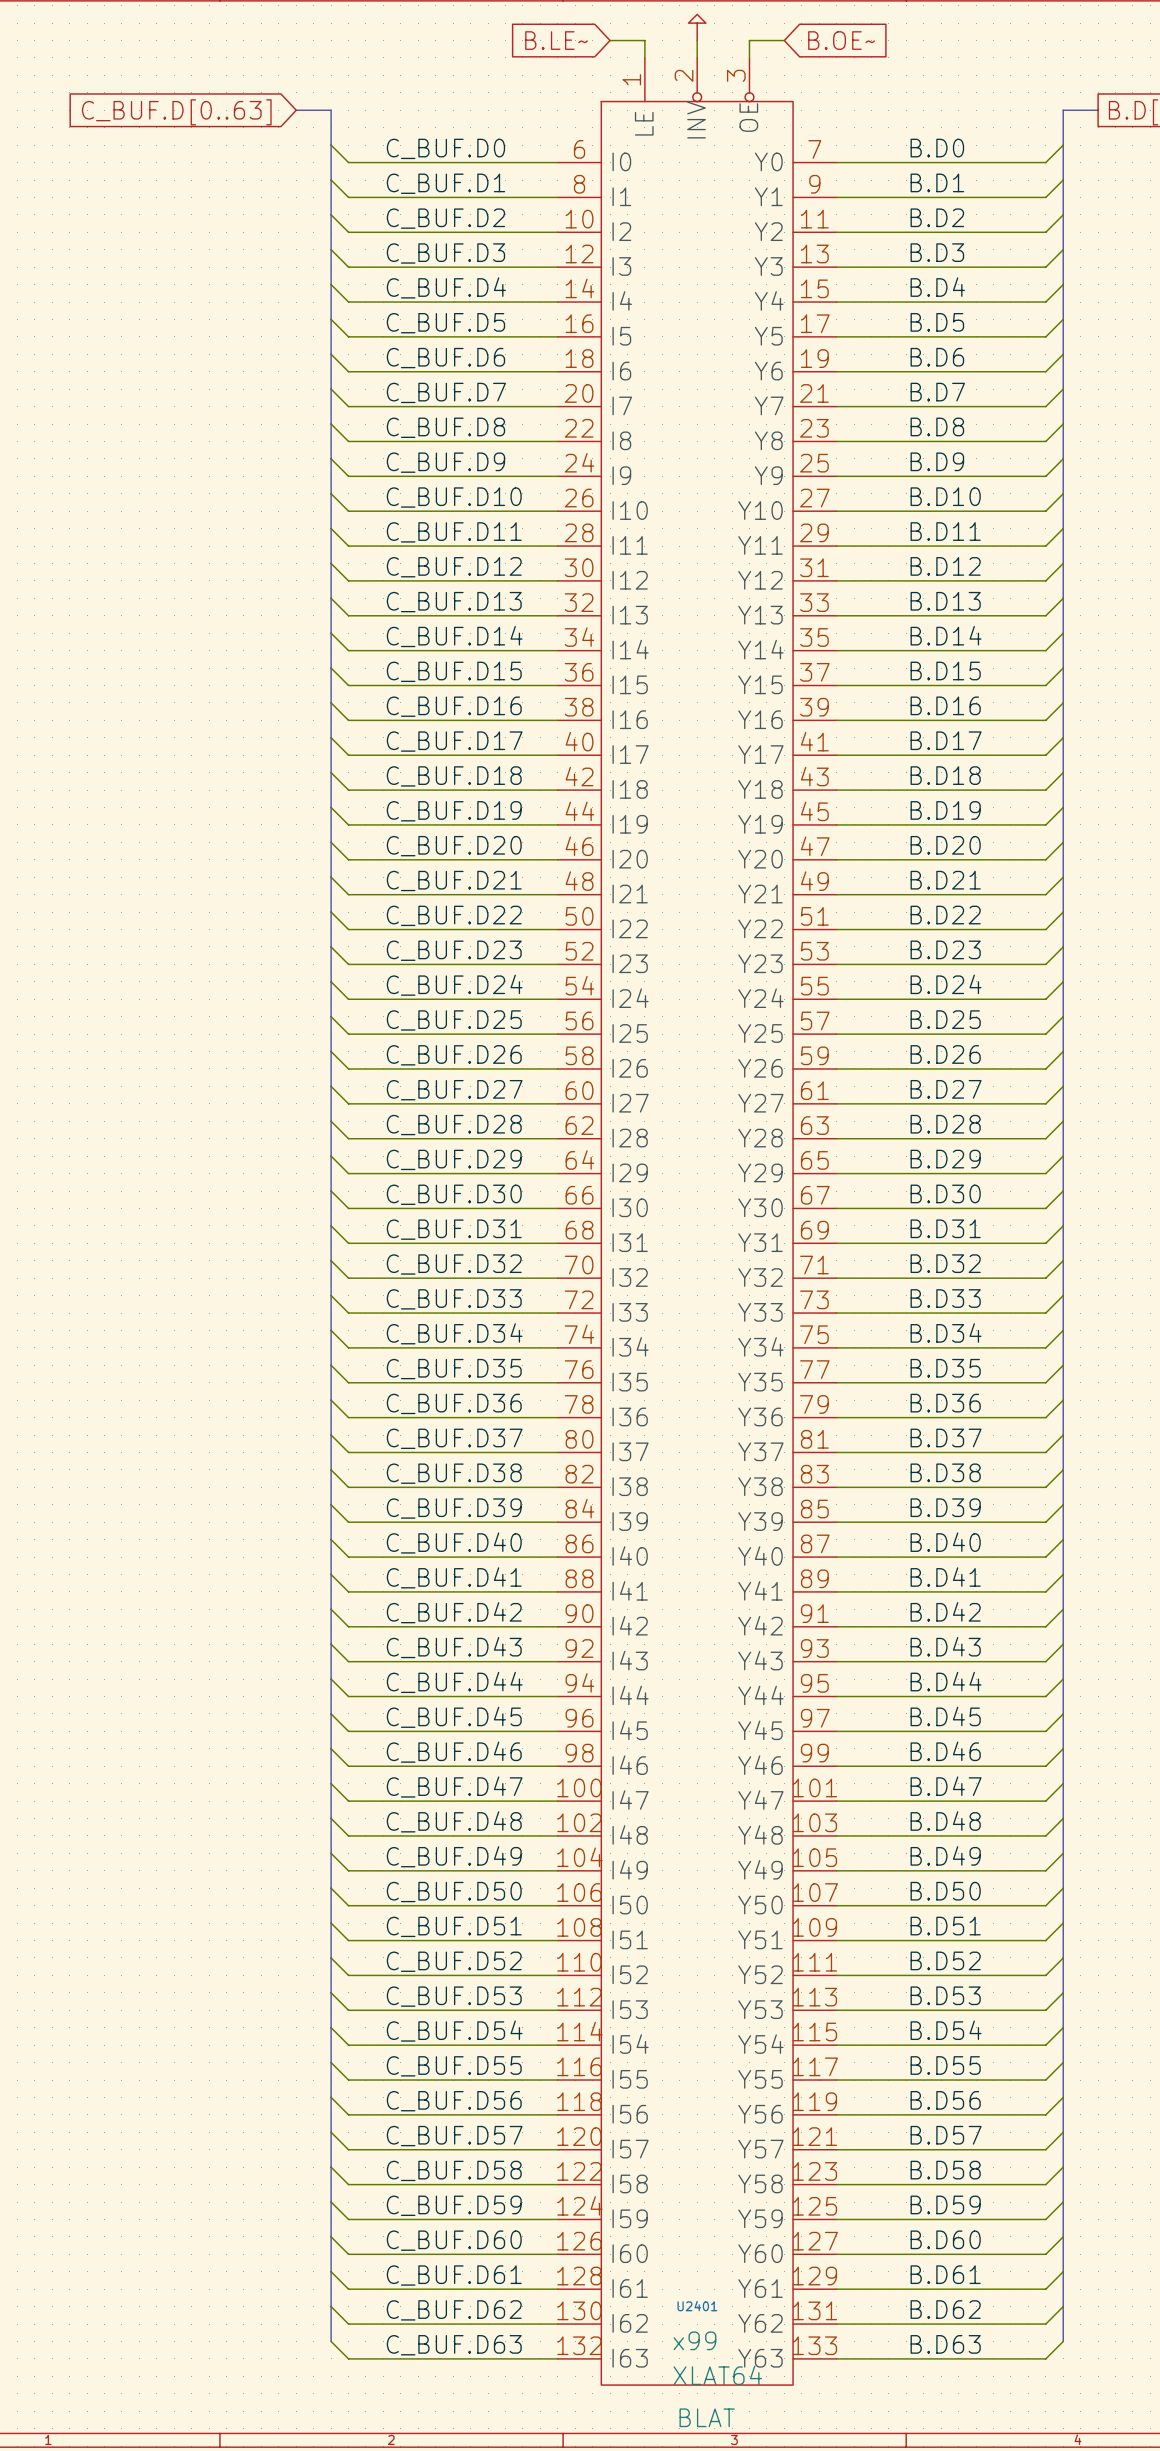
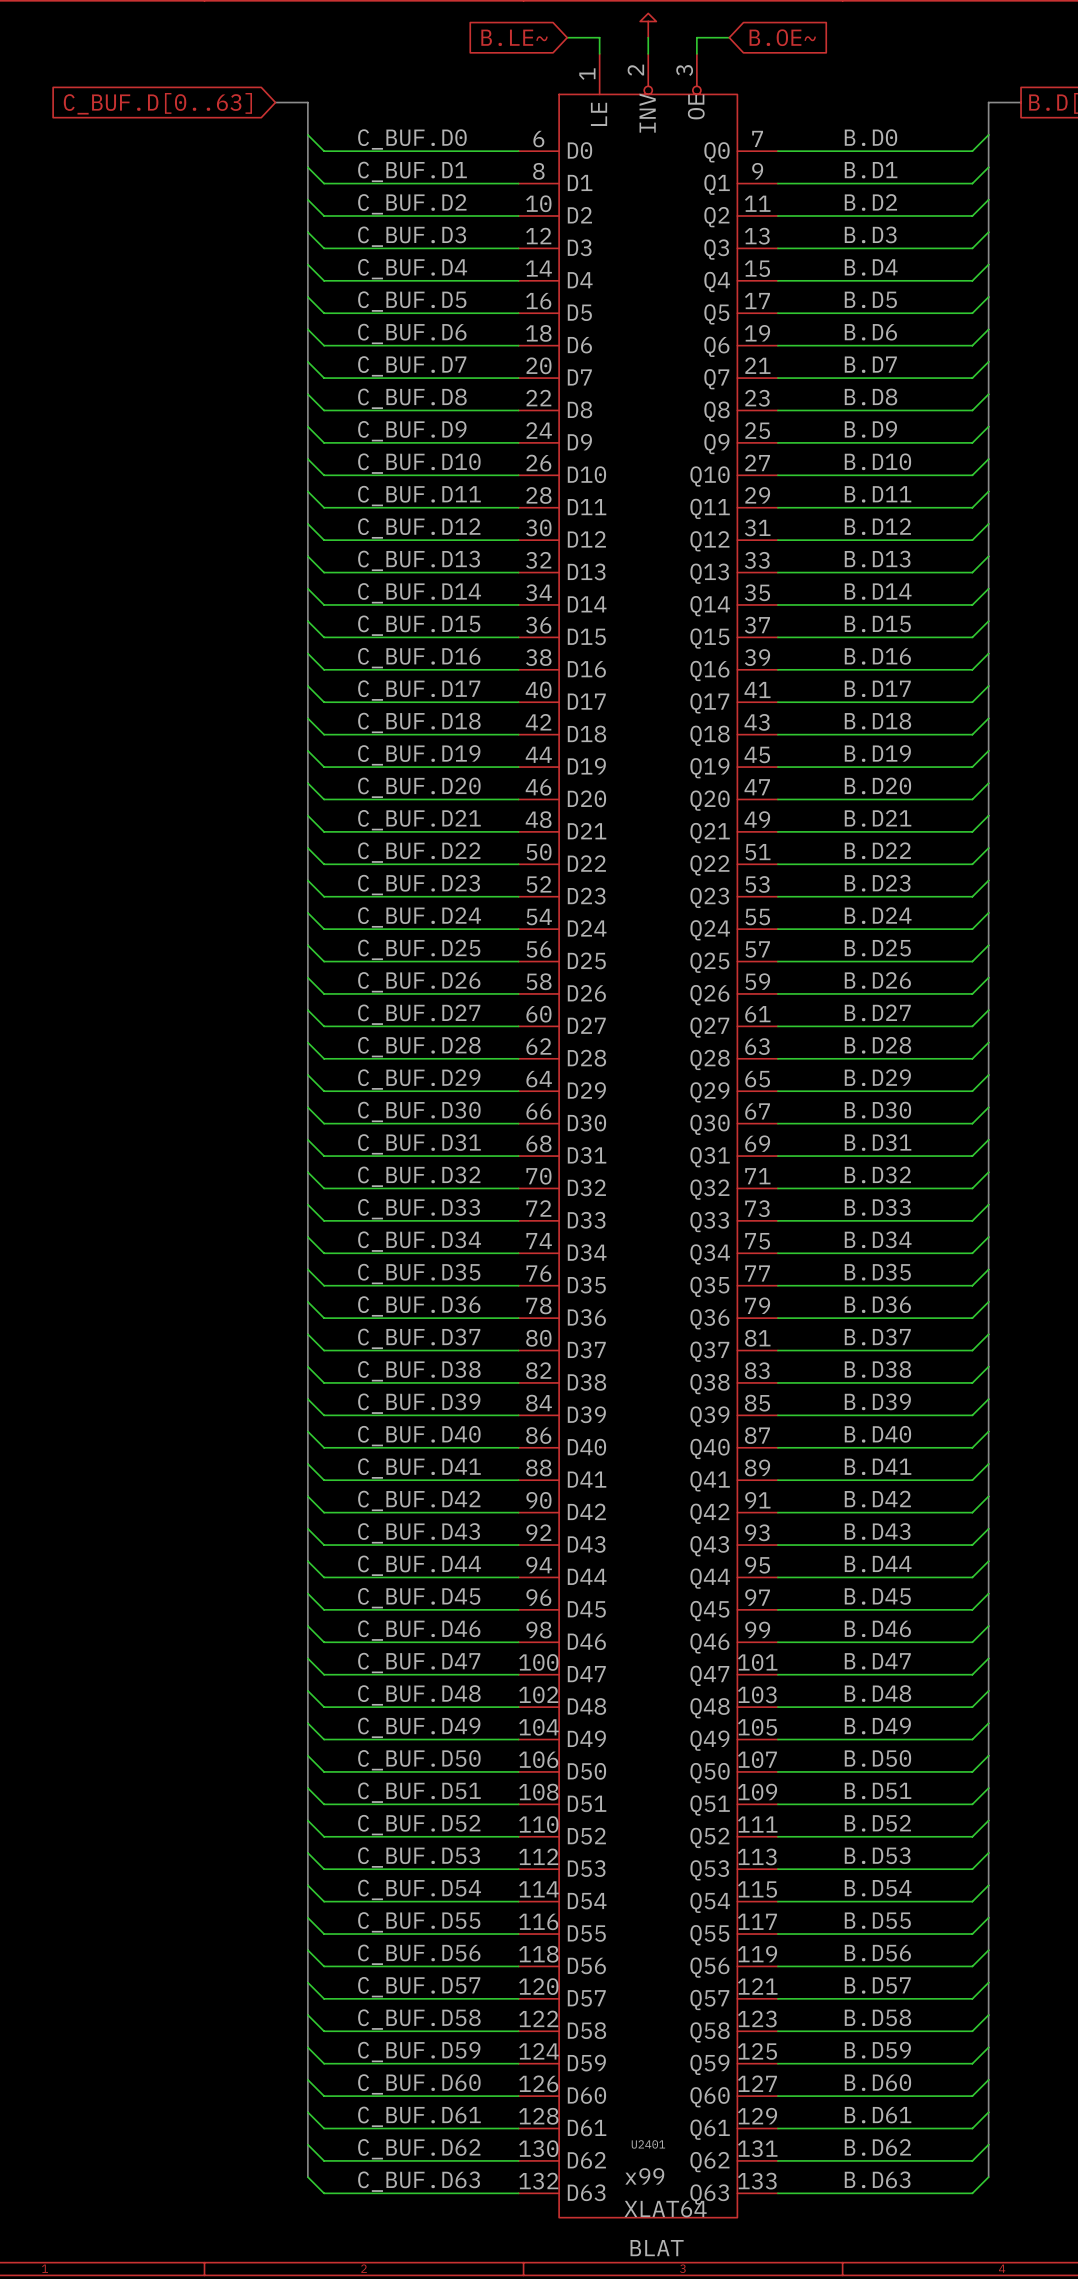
U2401 symbol: [557, 57, 837, 2386] -> [518, 53, 778, 2218]

